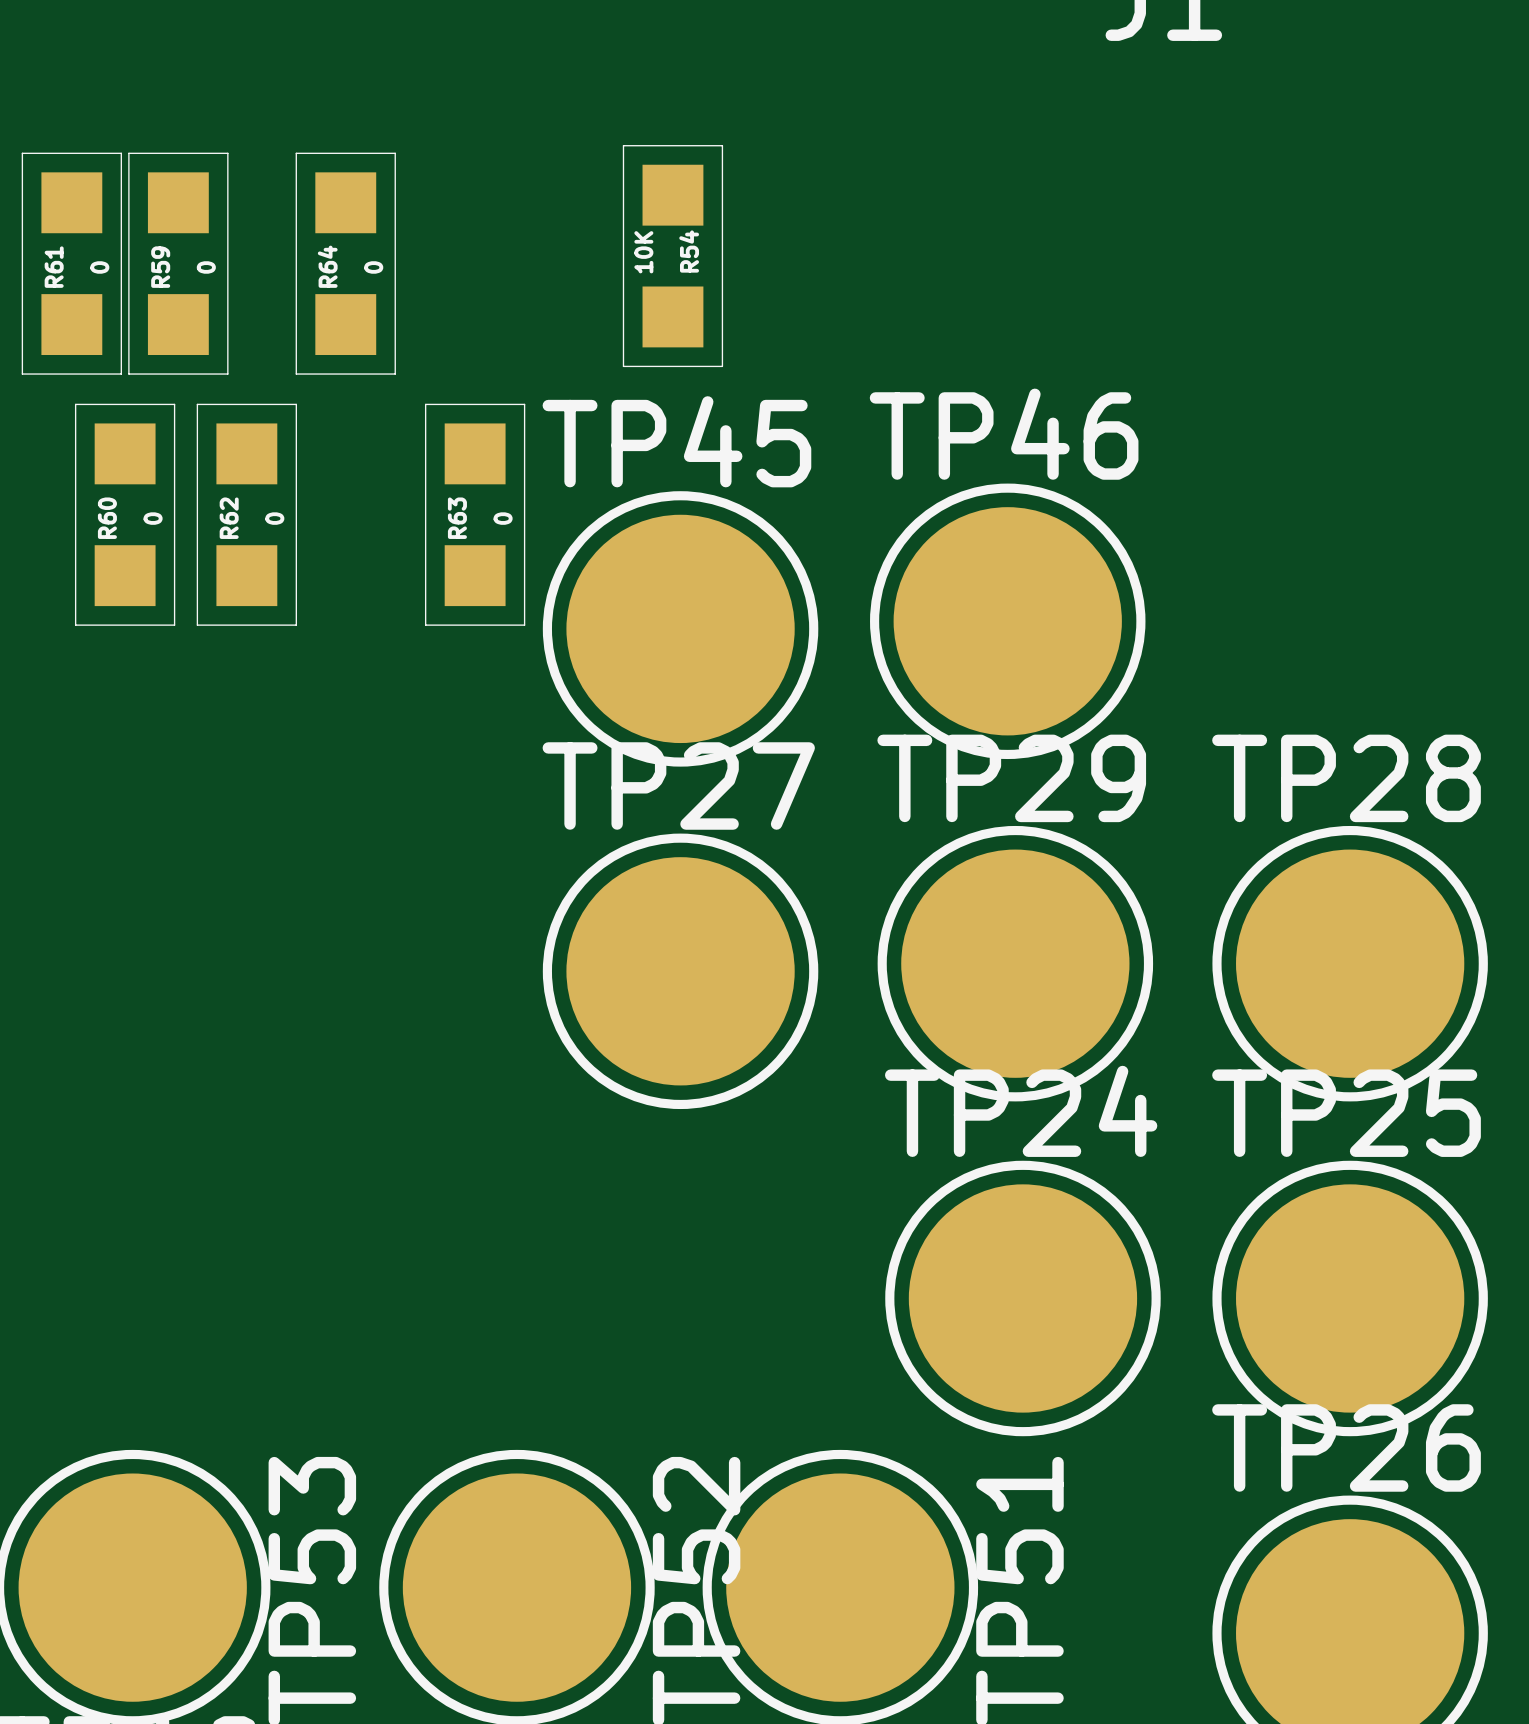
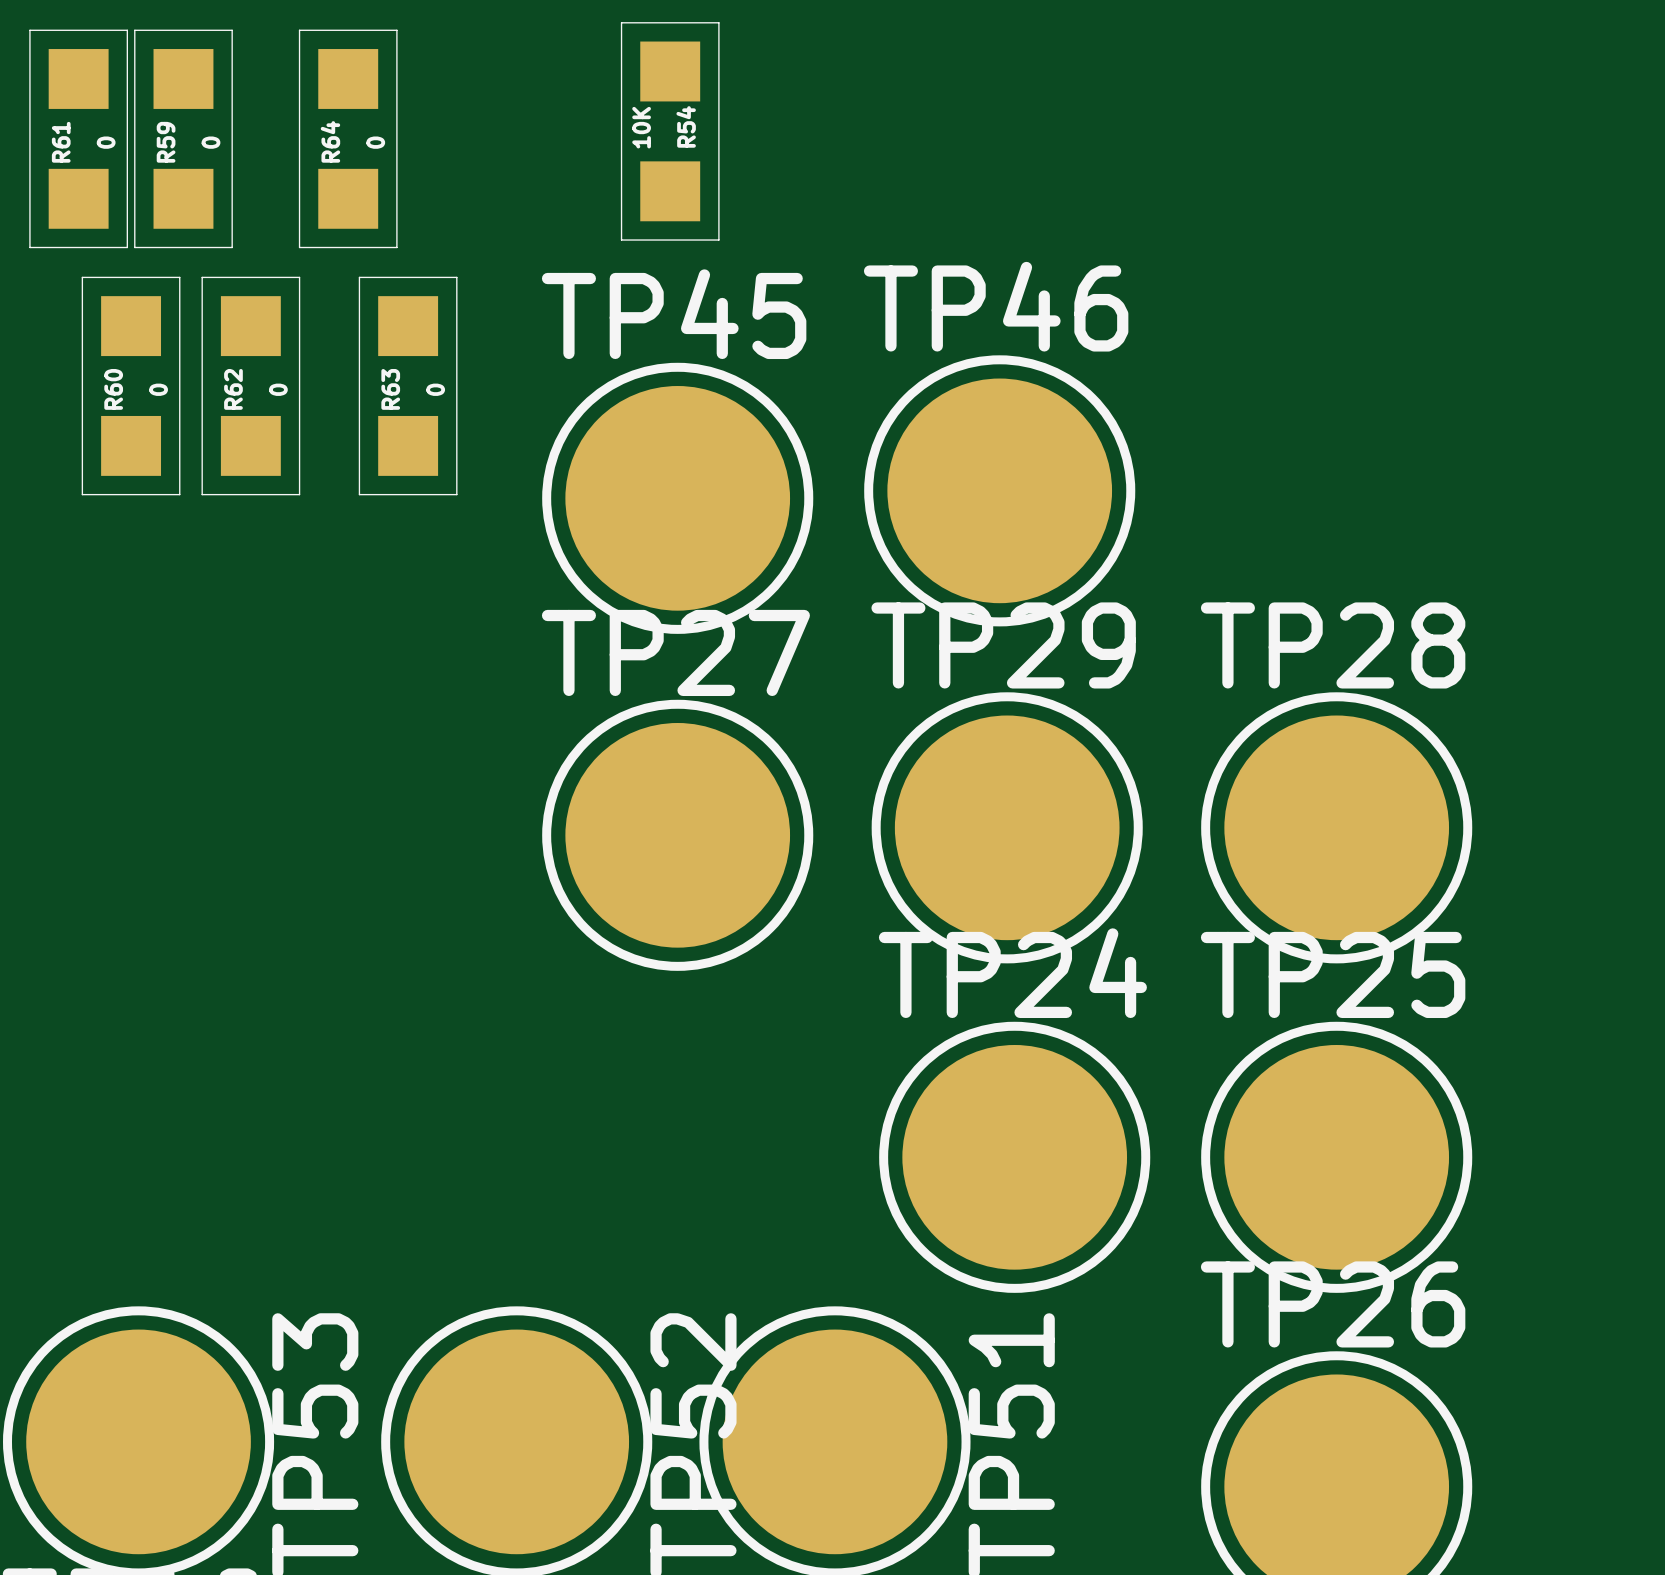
R63 position: (475, 514) -> (408, 386)

